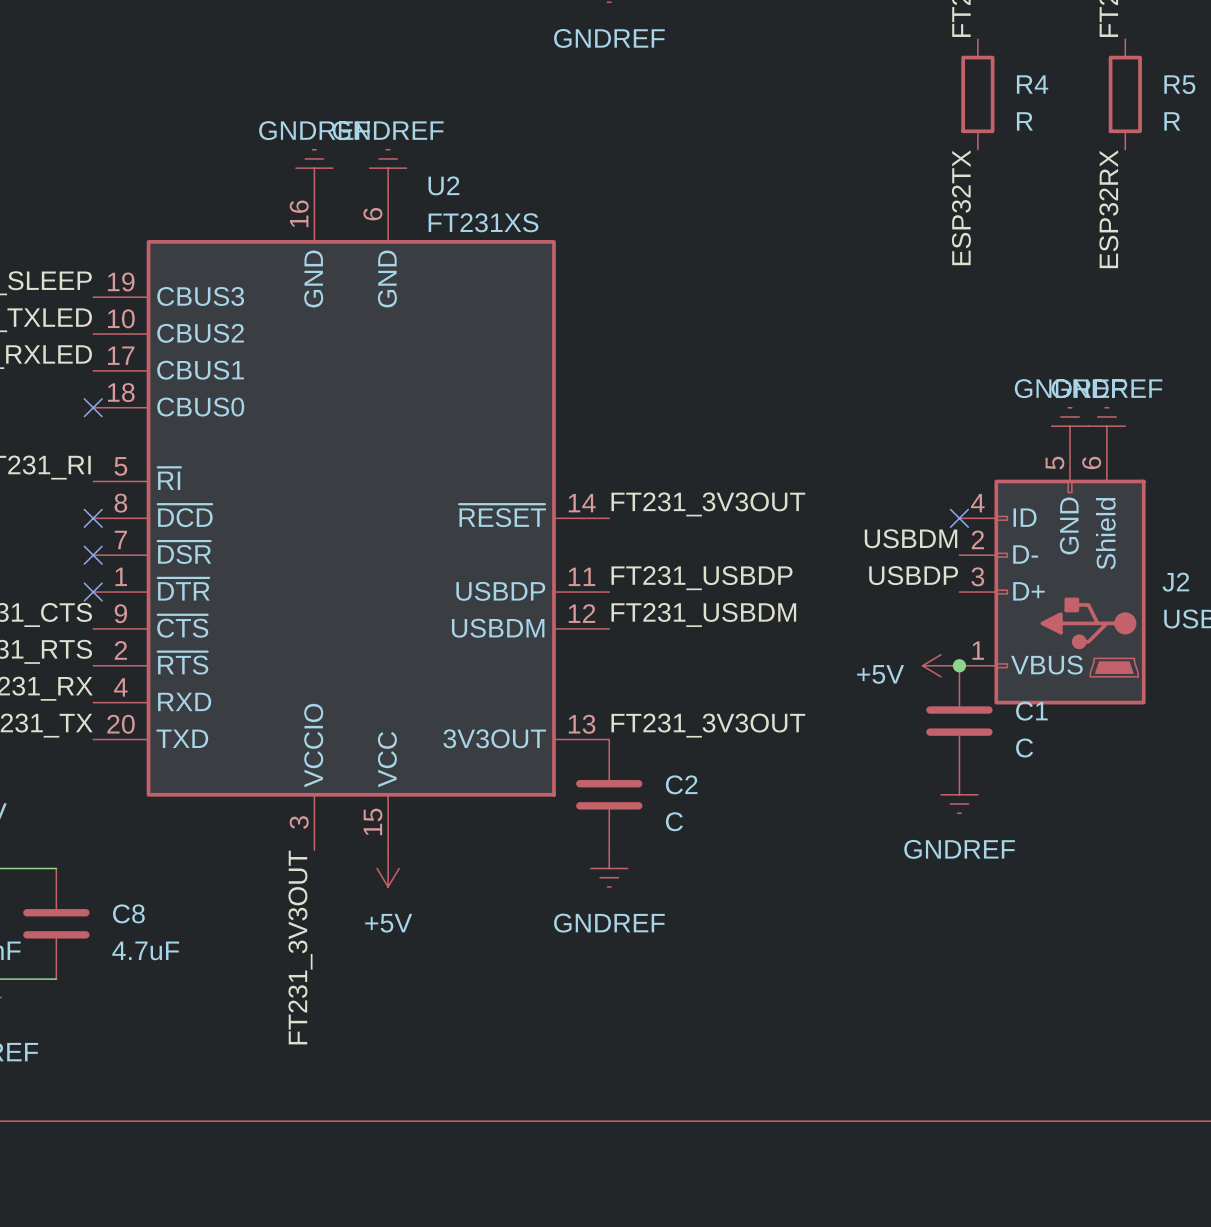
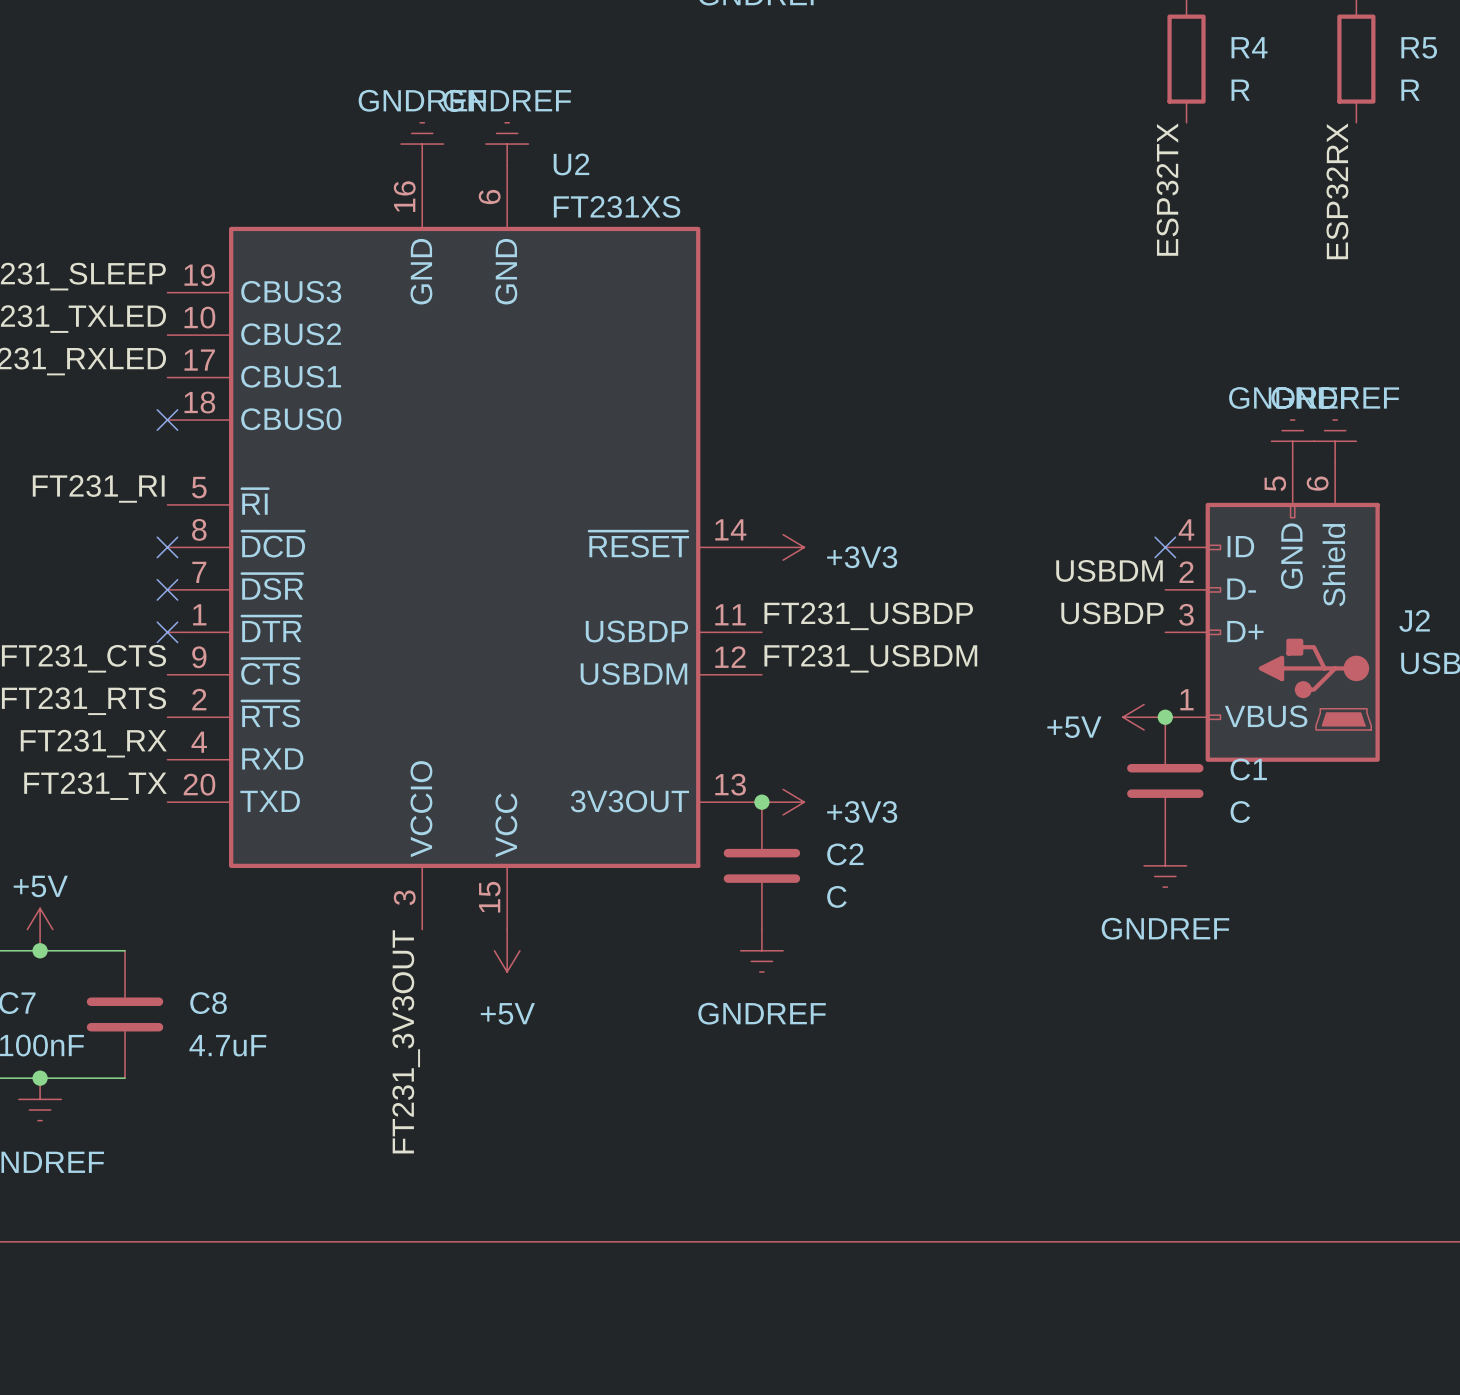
label: FT231_3V3OUT (708, 504) -> none
power symbol: none -> +3V3 (783, 547)
label: FT231_3V3OUT (708, 725) -> none
junction: none -> (761, 802)
power symbol: none -> +3V3 (783, 802)

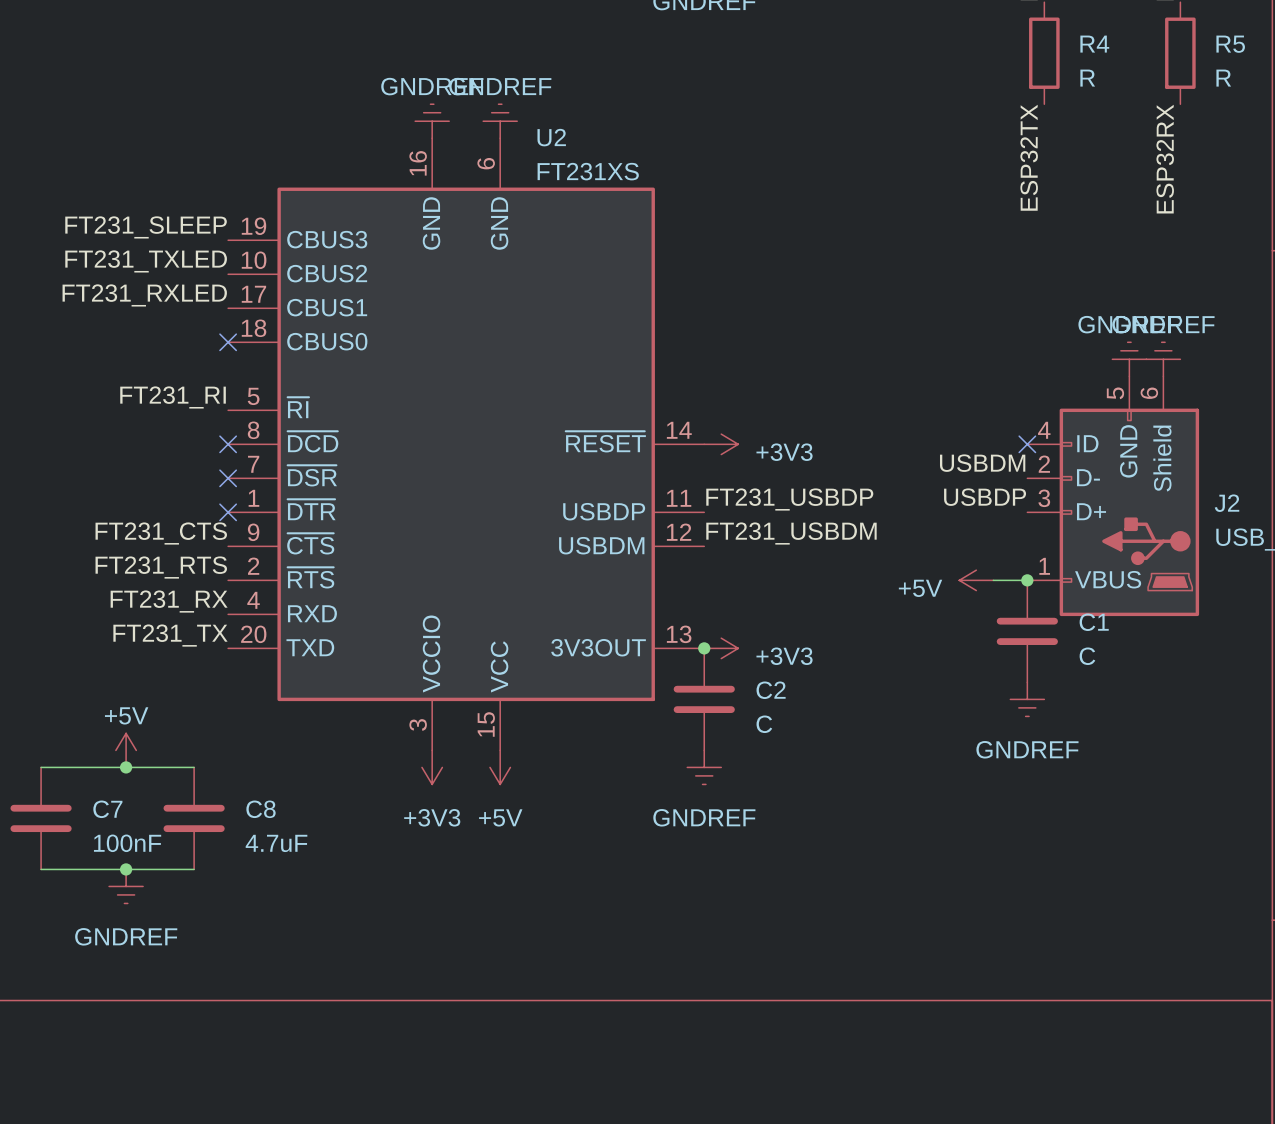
power symbol position: +5V (1144, 717) -> +5V (976, 580)
power symbol: none -> +3V3 (432, 767)
label: FT231_3V3OUT (406, 1041) -> none

